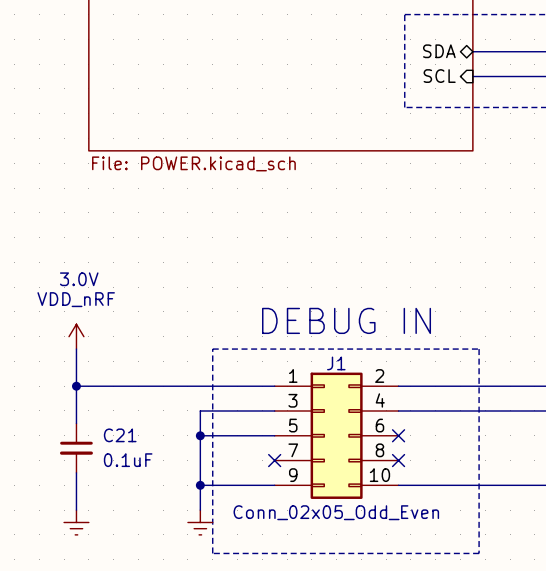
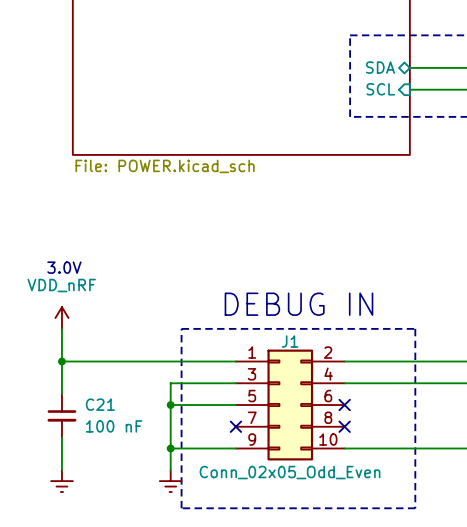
C21 value: 0.1uF (128, 460) -> 100 nF (114, 426)

